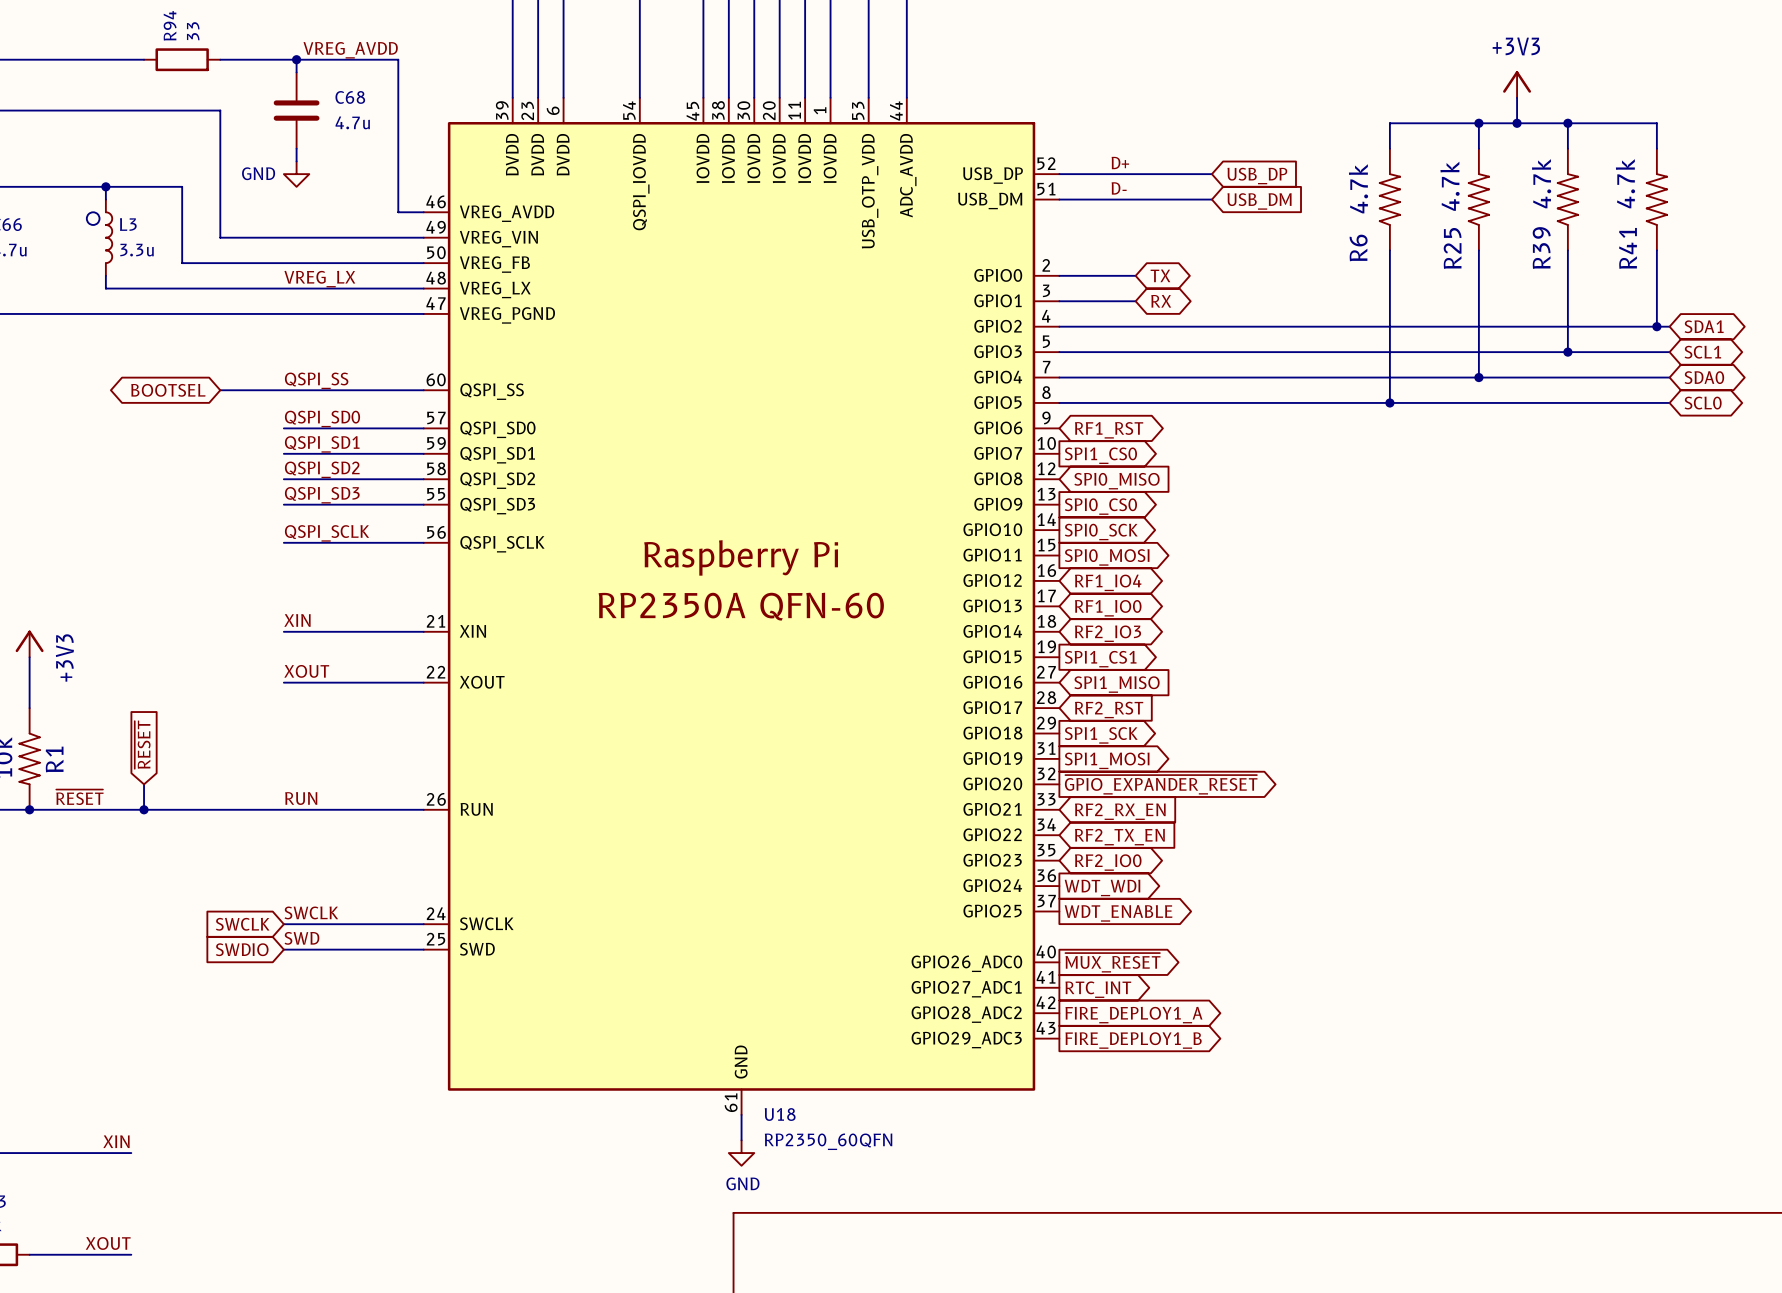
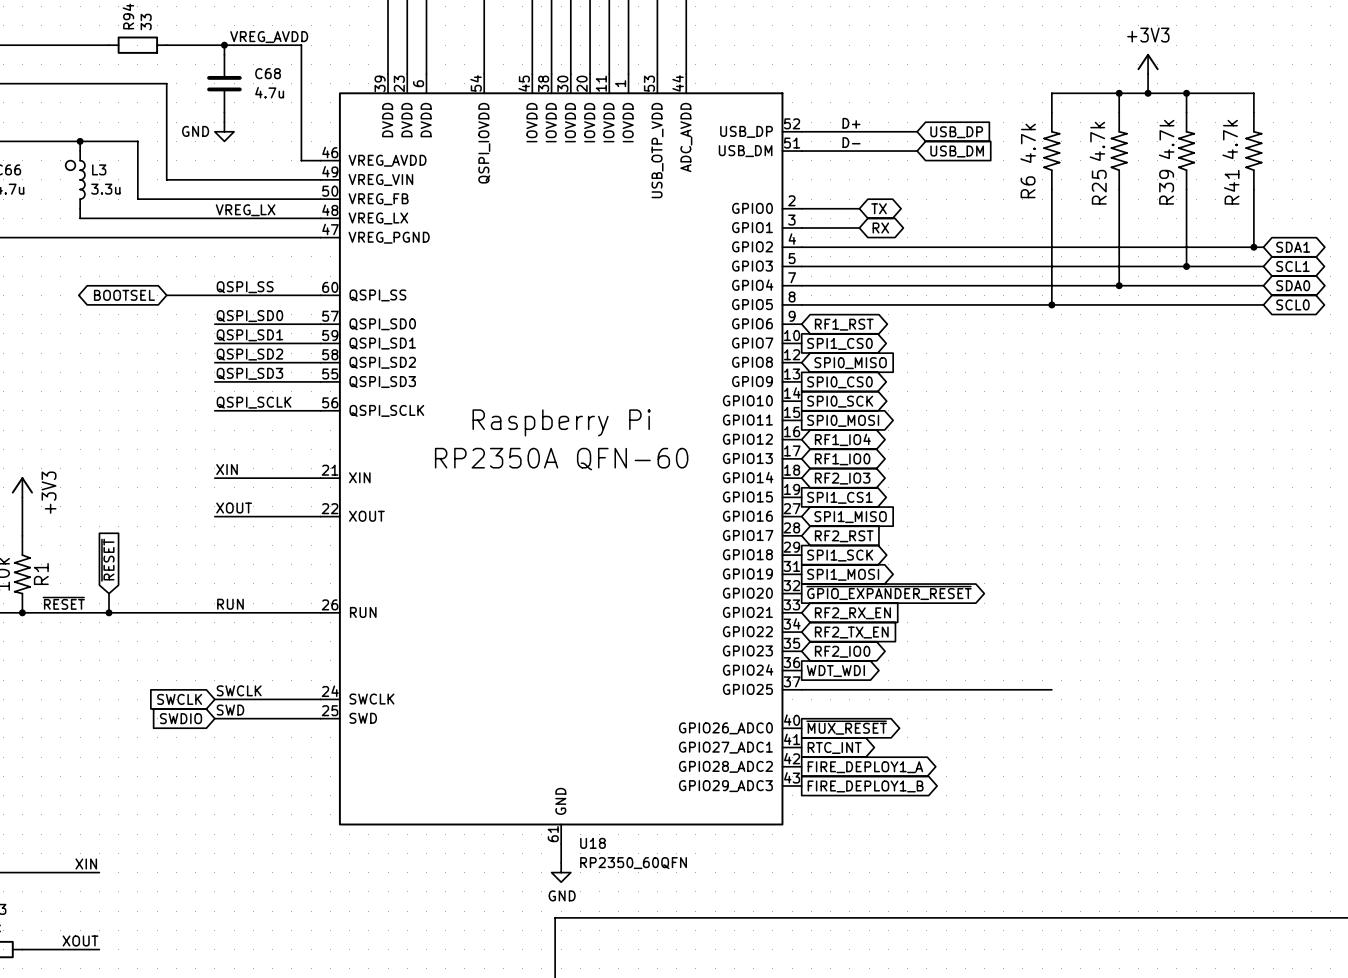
wire: none -> (801, 689) (1051, 689)
global label: WDT_ENABLE (1118, 913) -> none

